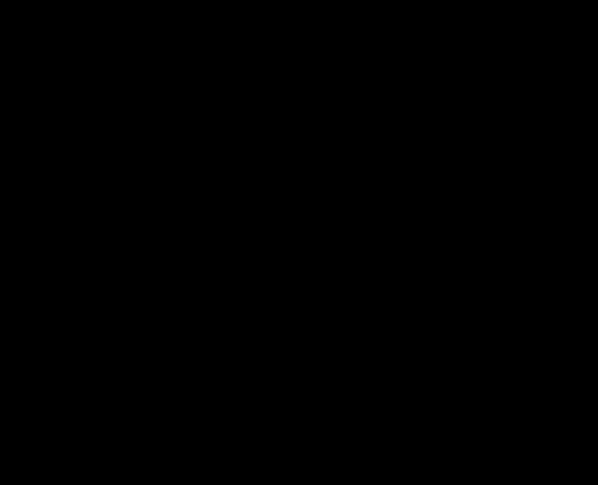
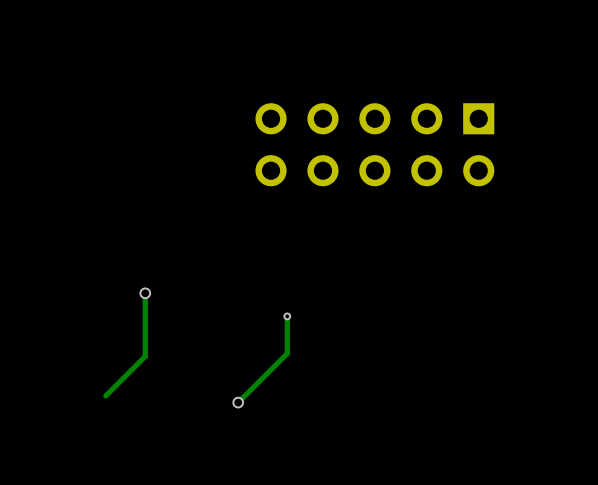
part: none -> (374, 144)
track: none -> (145, 293) (145, 356) (105, 395)
via: none -> (145, 293)
track: none -> (287, 316) (287, 353) (238, 402)
via: none -> (287, 316)
via: none -> (238, 402)

